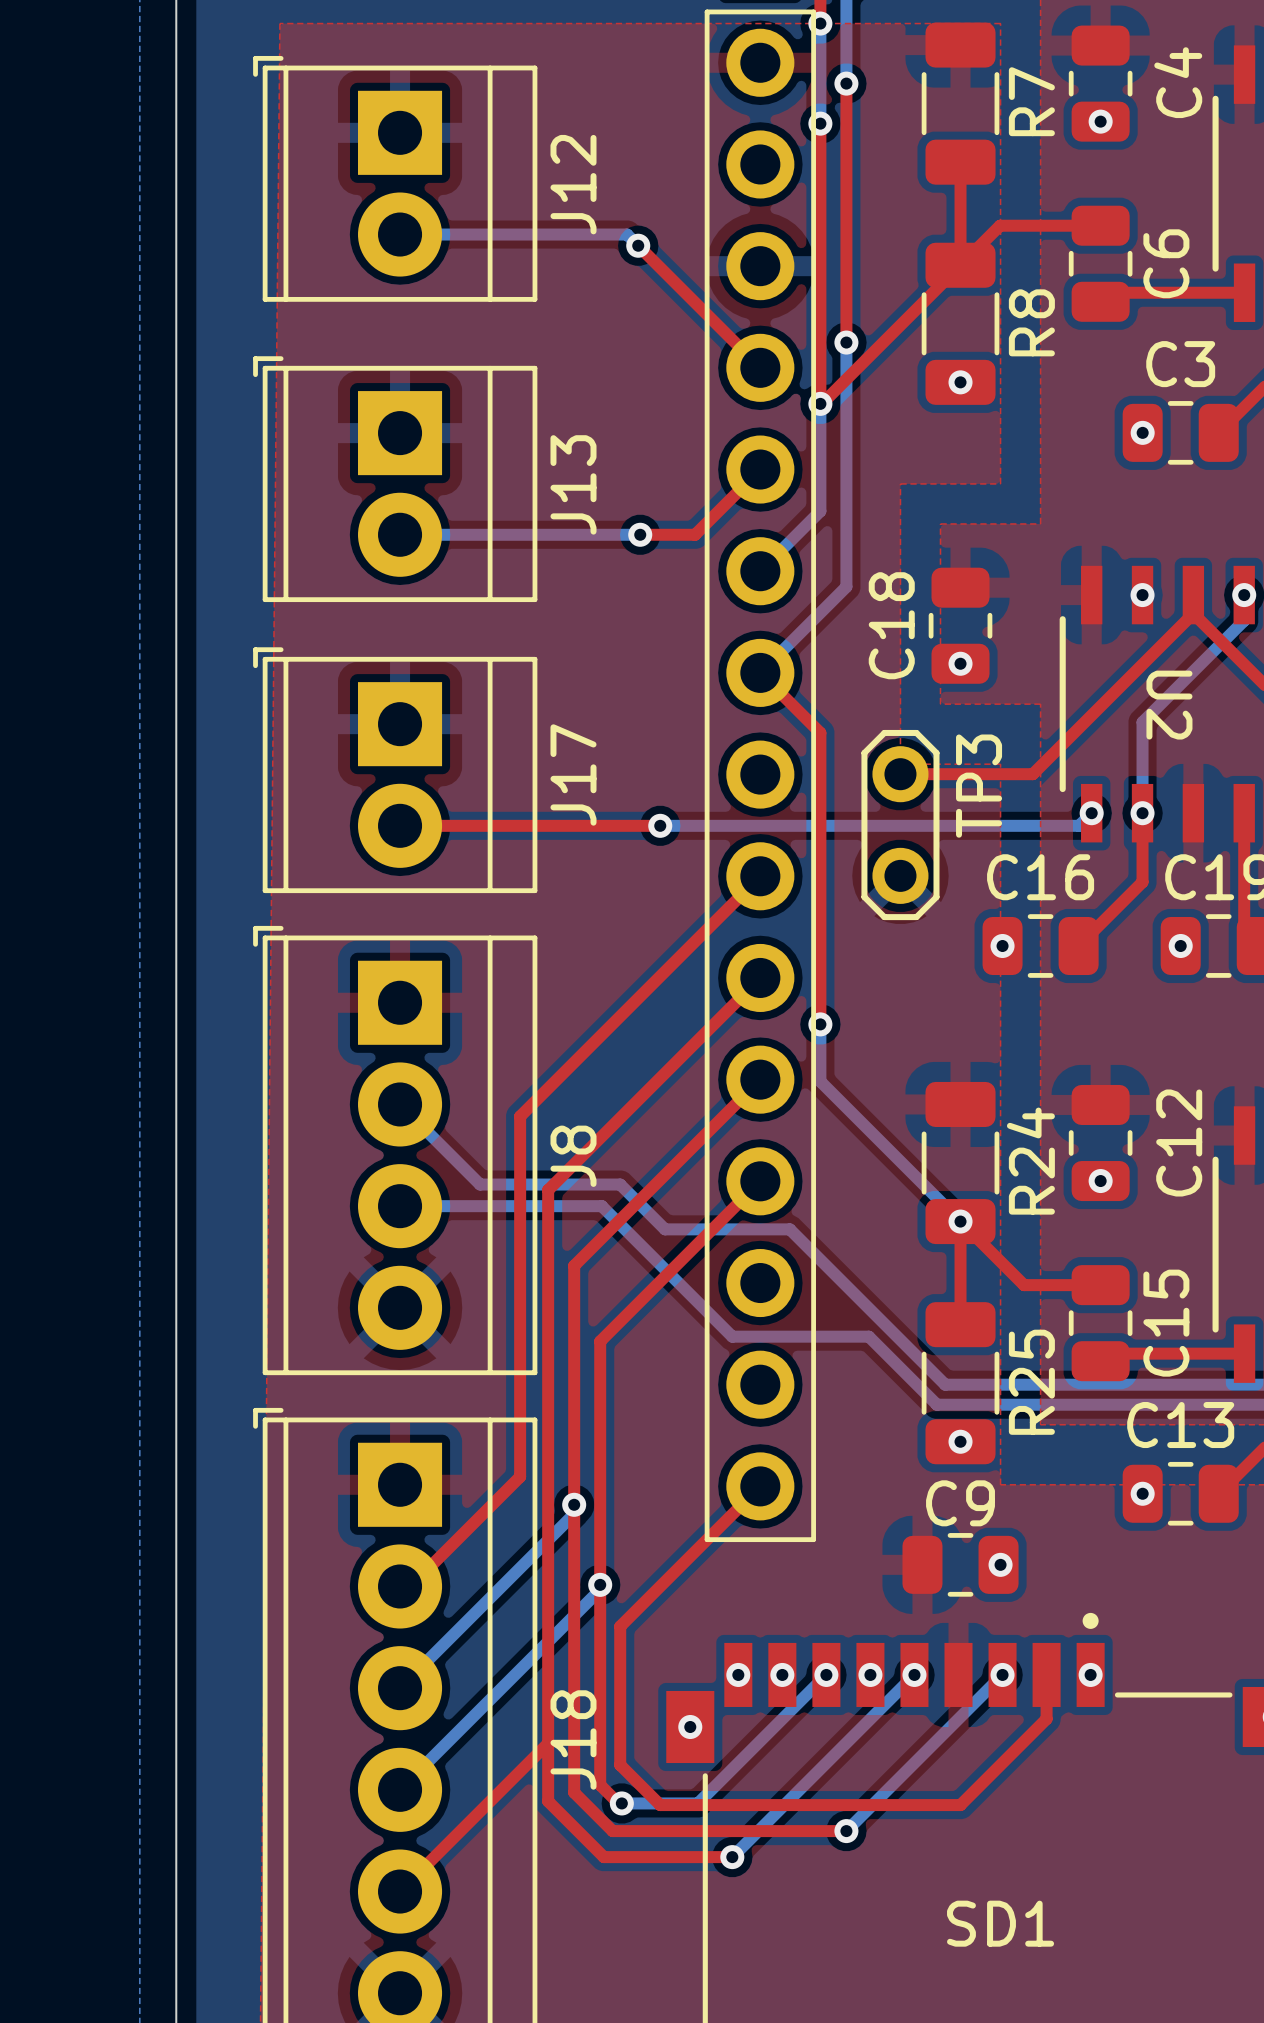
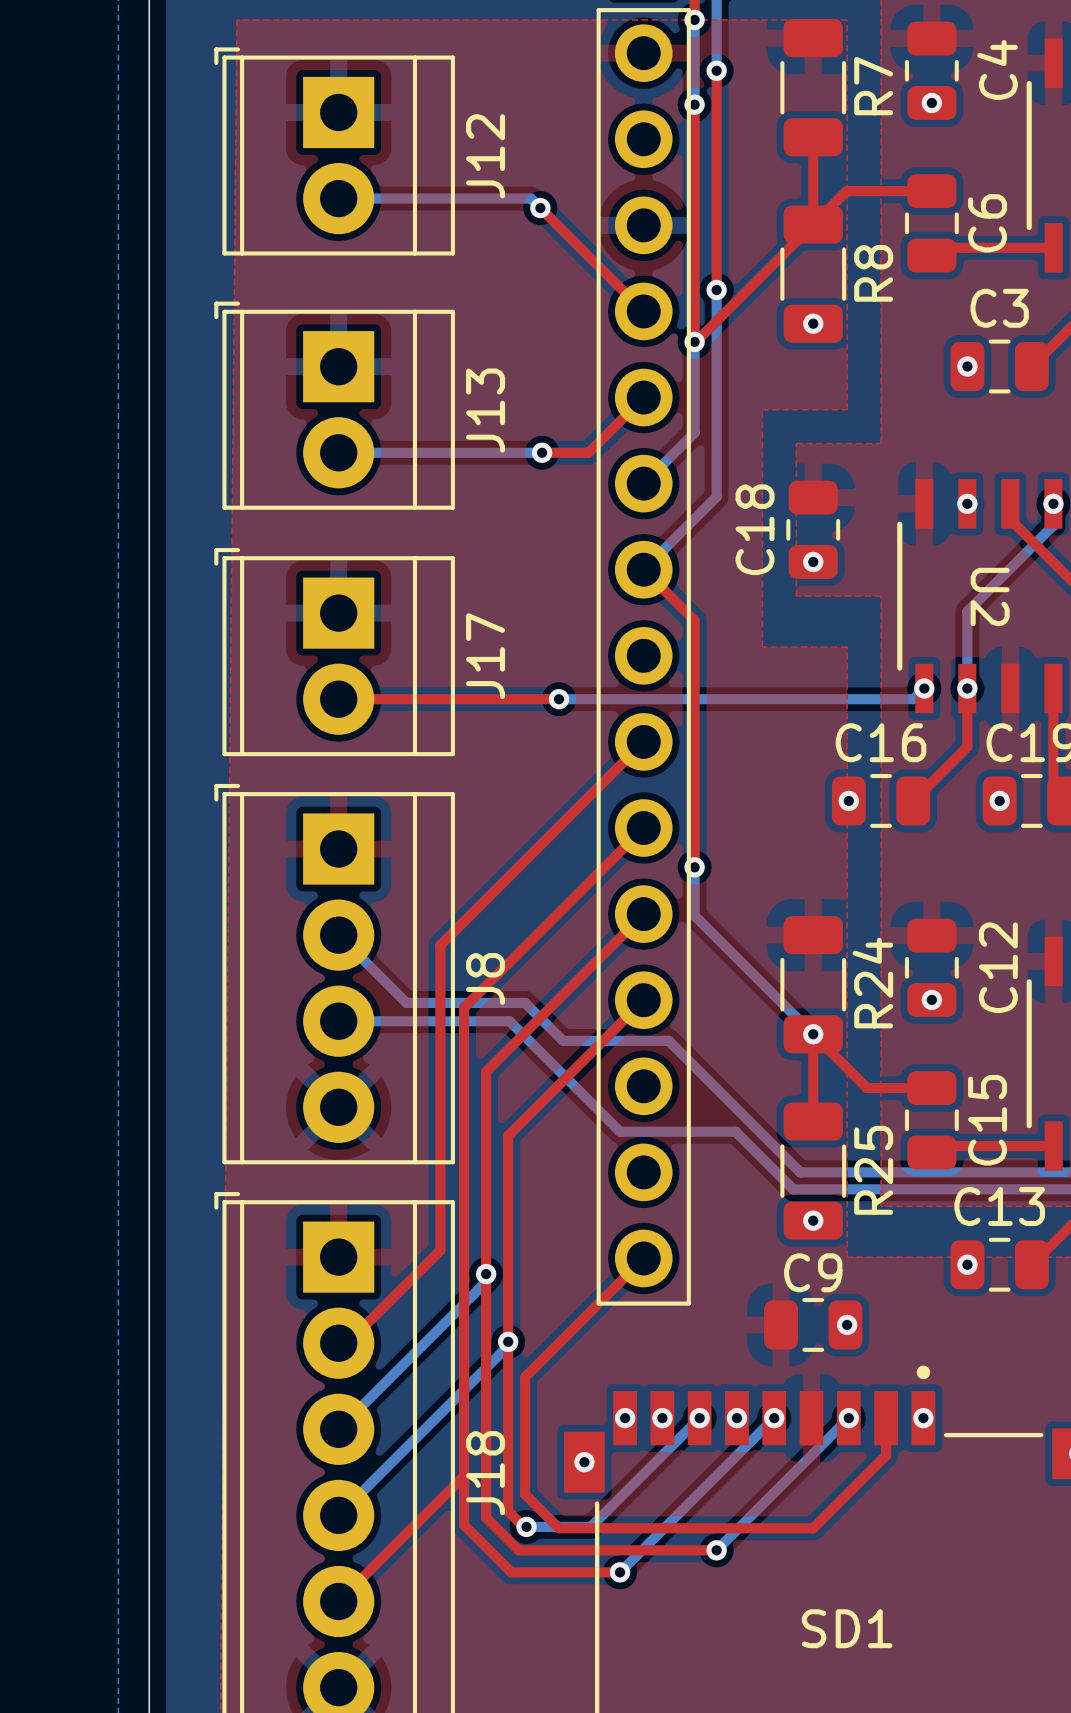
top track: (1193, 613) (1032, 774) (900, 774) -> none
TP3: (900, 825) -> none

